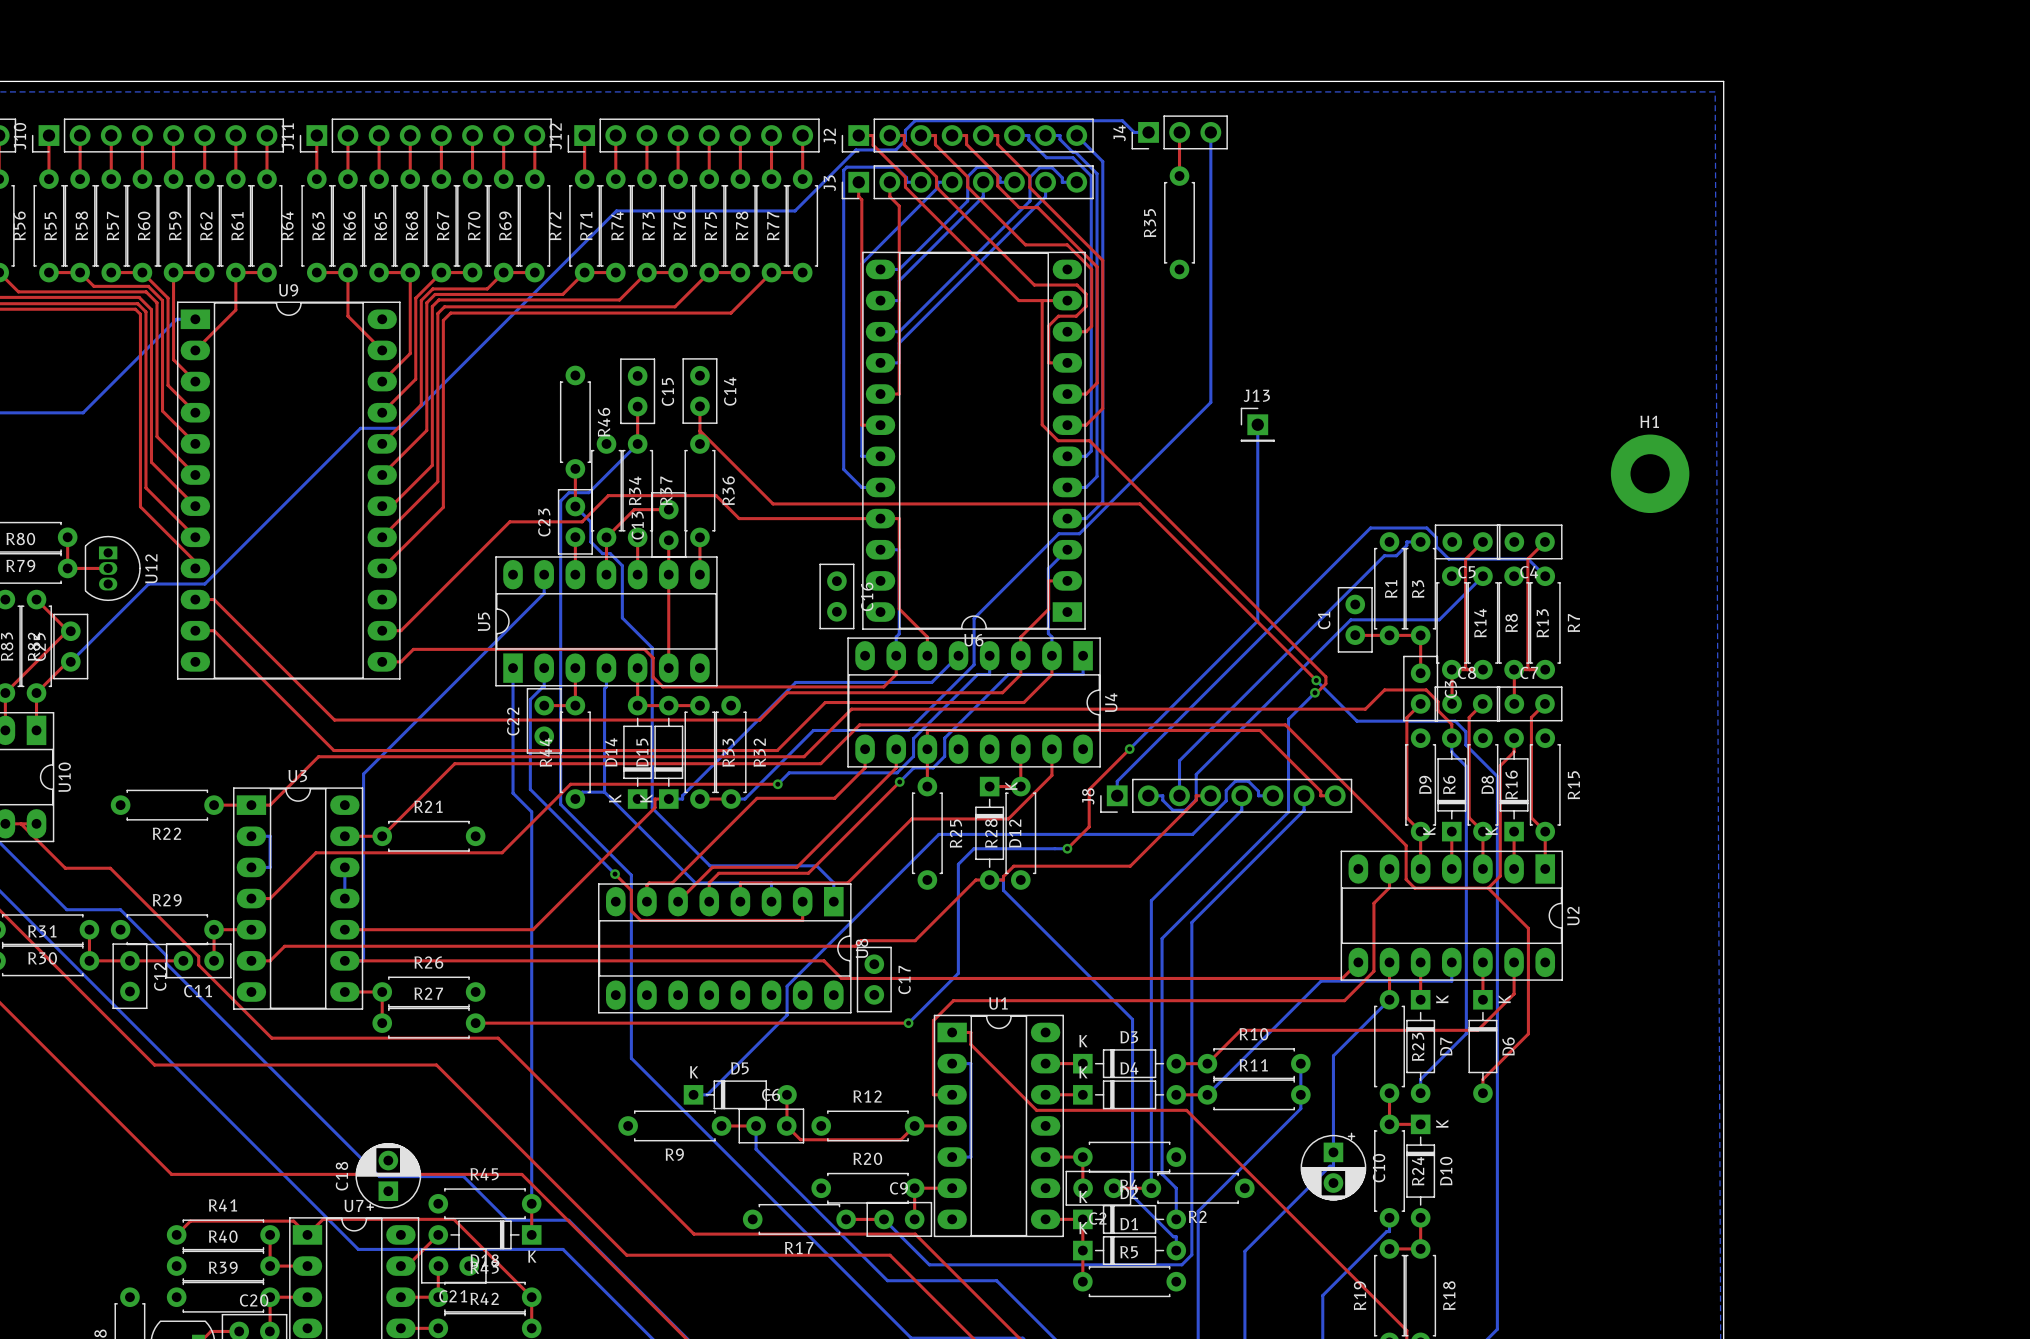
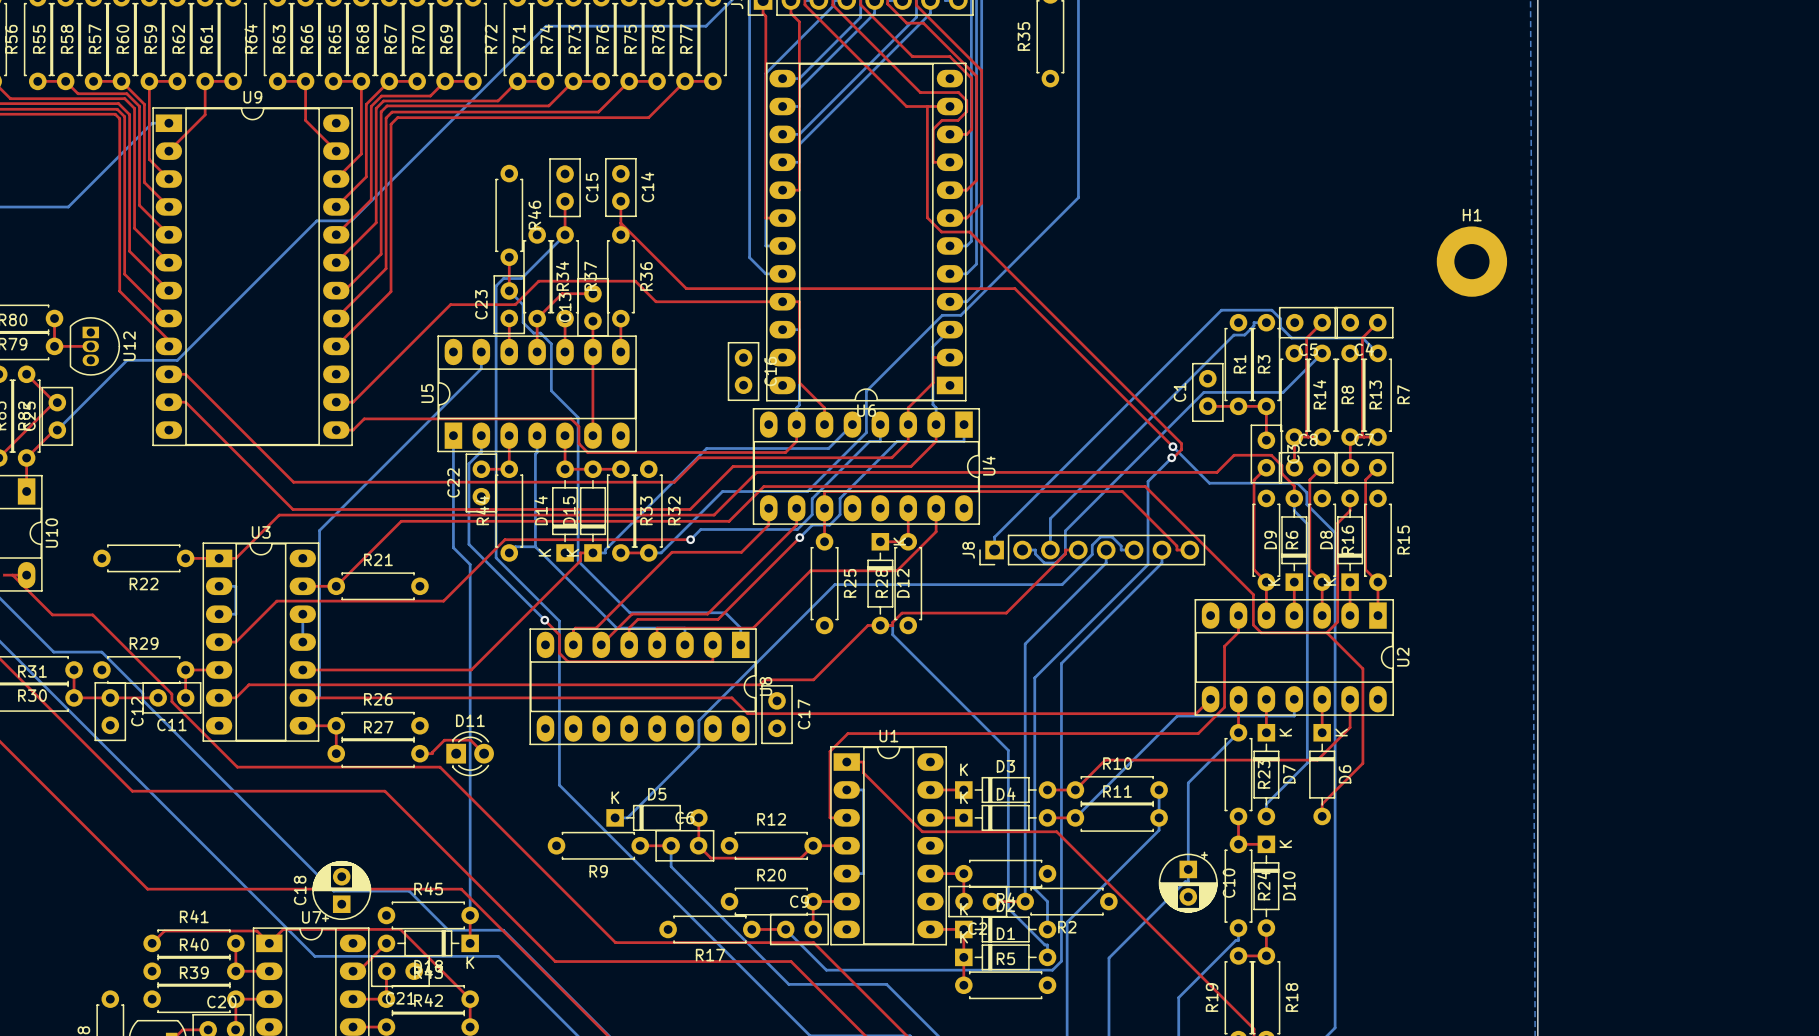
bottom track: (1257, 424) (1257, 620) (1129, 749) -> none
J13: (1257, 424) -> none
top track: (1129, 749) (1089, 789) (1089, 826) (1067, 848) -> none
via: (1129, 749) -> none
bottom track: (1067, 848) (973, 848) (958, 864) (958, 973) (908, 1023) -> none
via: (1067, 848) -> none
top track: (489, 1023) (908, 1023) -> (432, 753) (444, 740) (470, 740) (484, 753)
D11: none -> (470, 753)
via: (908, 1023) -> none

